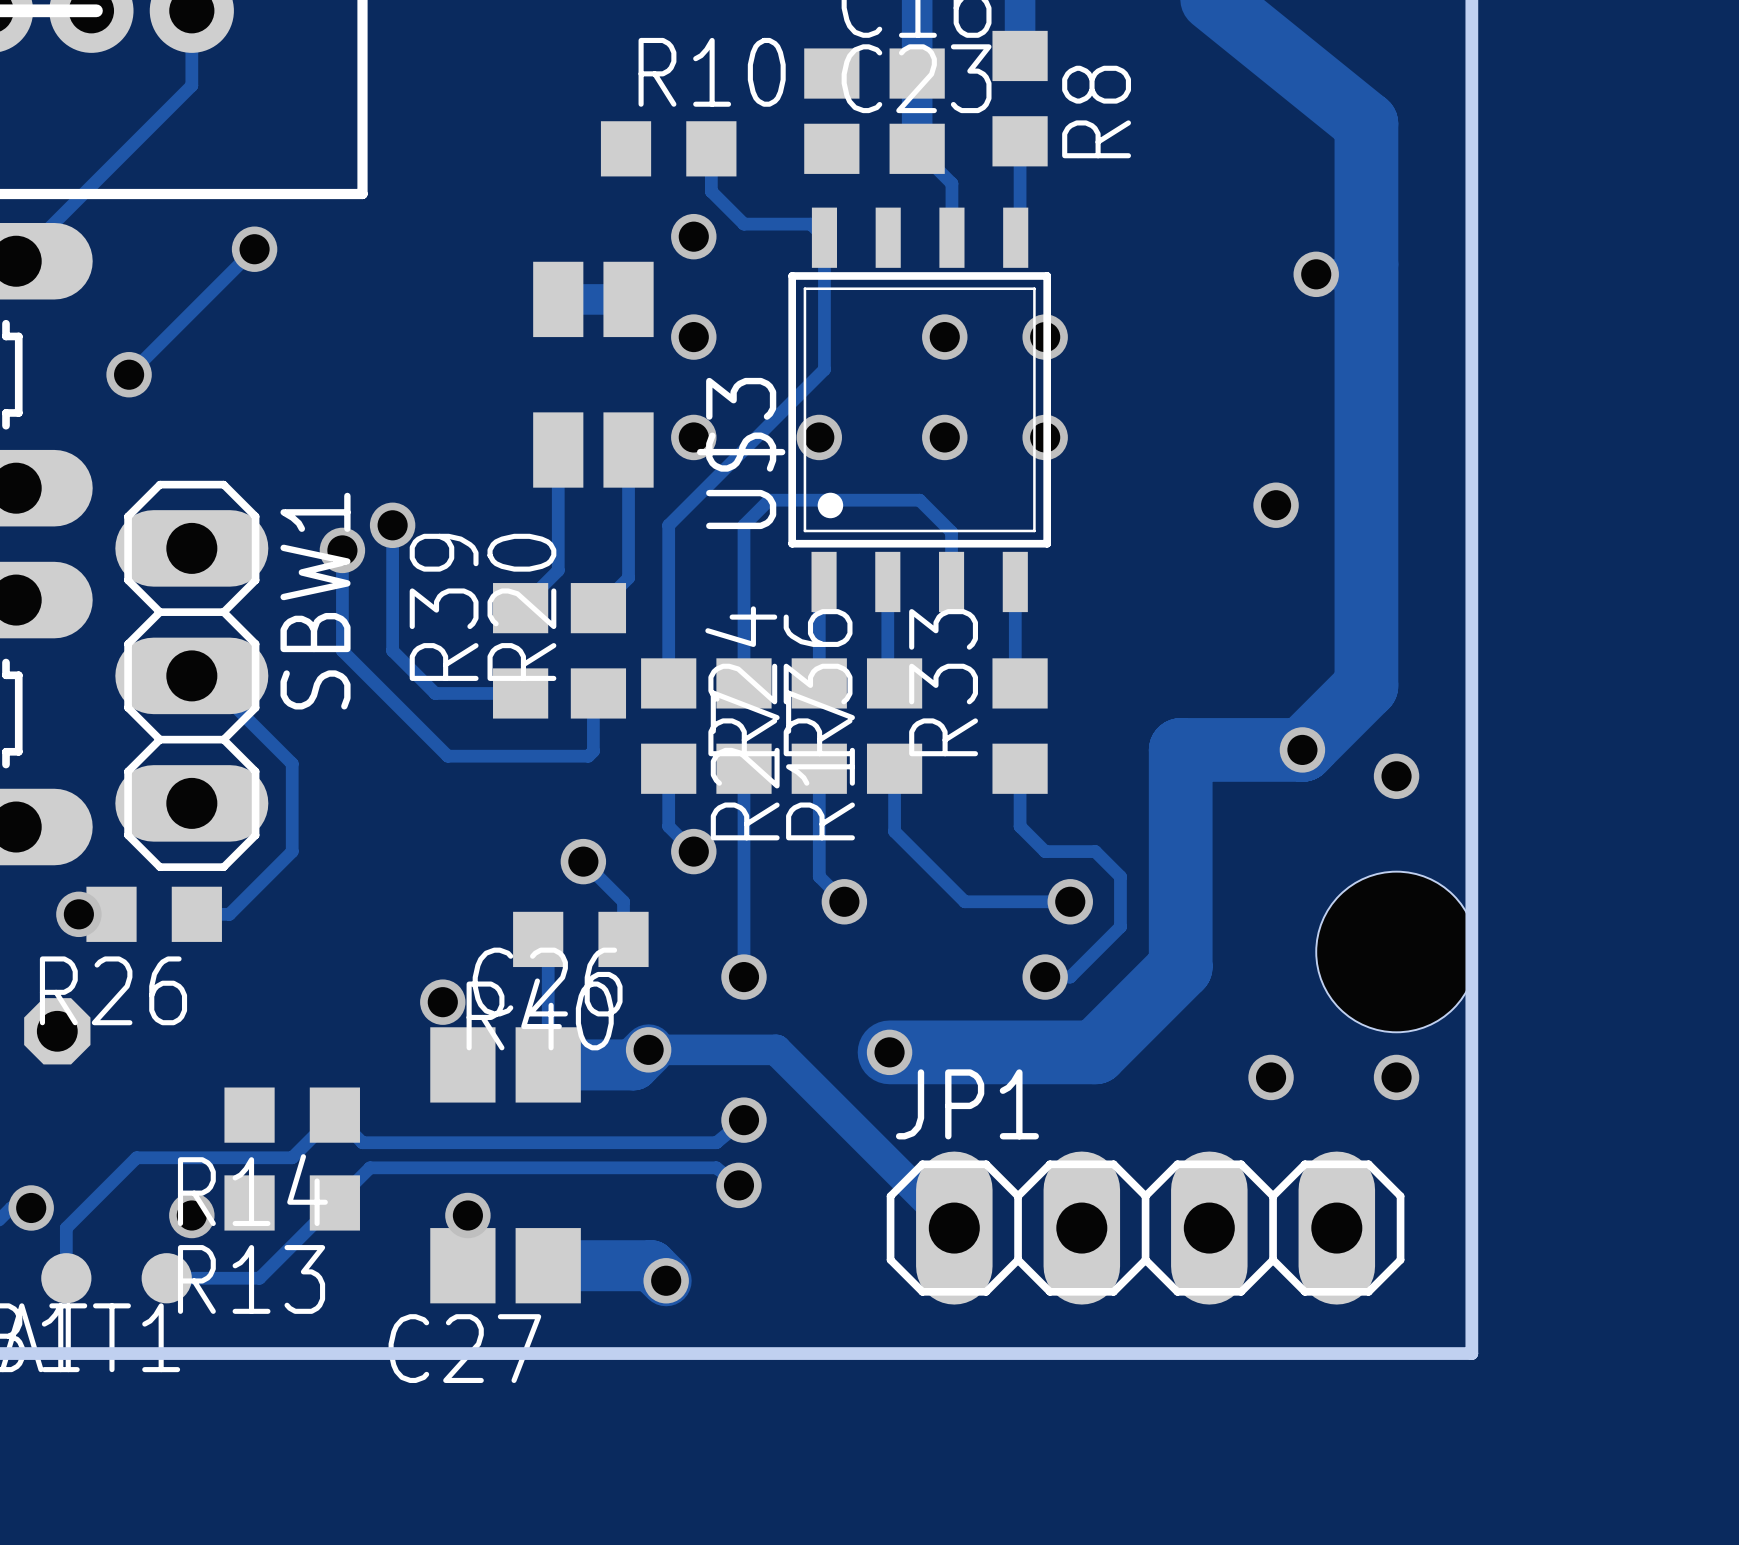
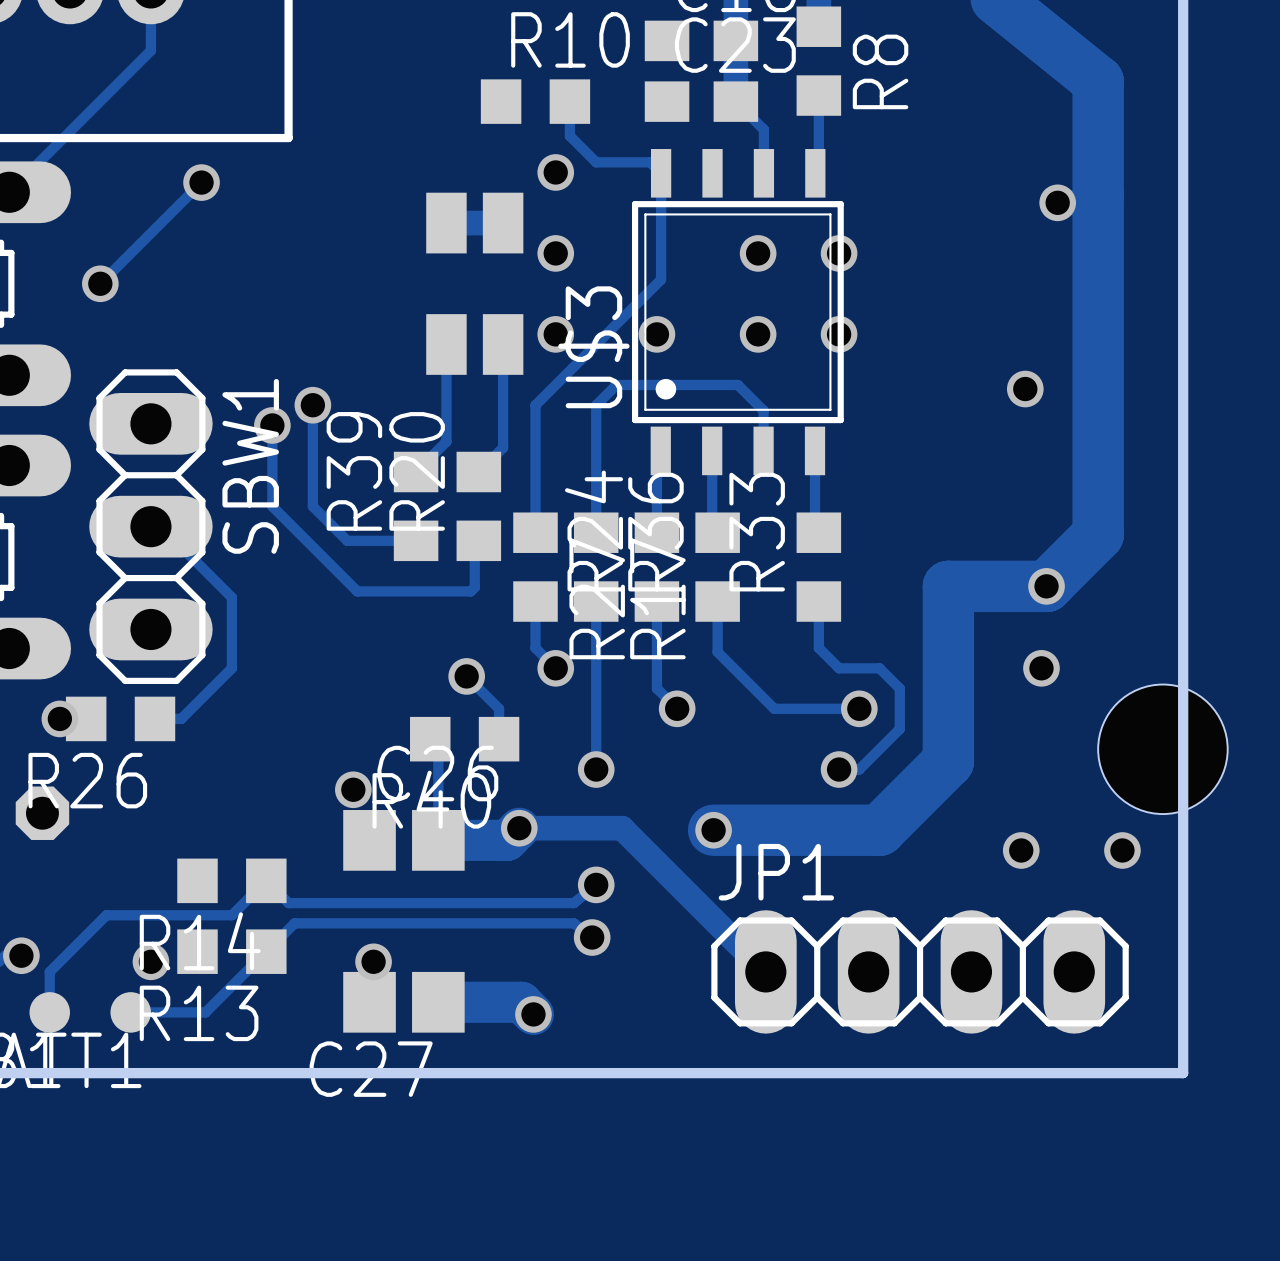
via position: (1396, 776) -> (1041, 668)
hole position: (1396, 951) -> (1162, 749)

